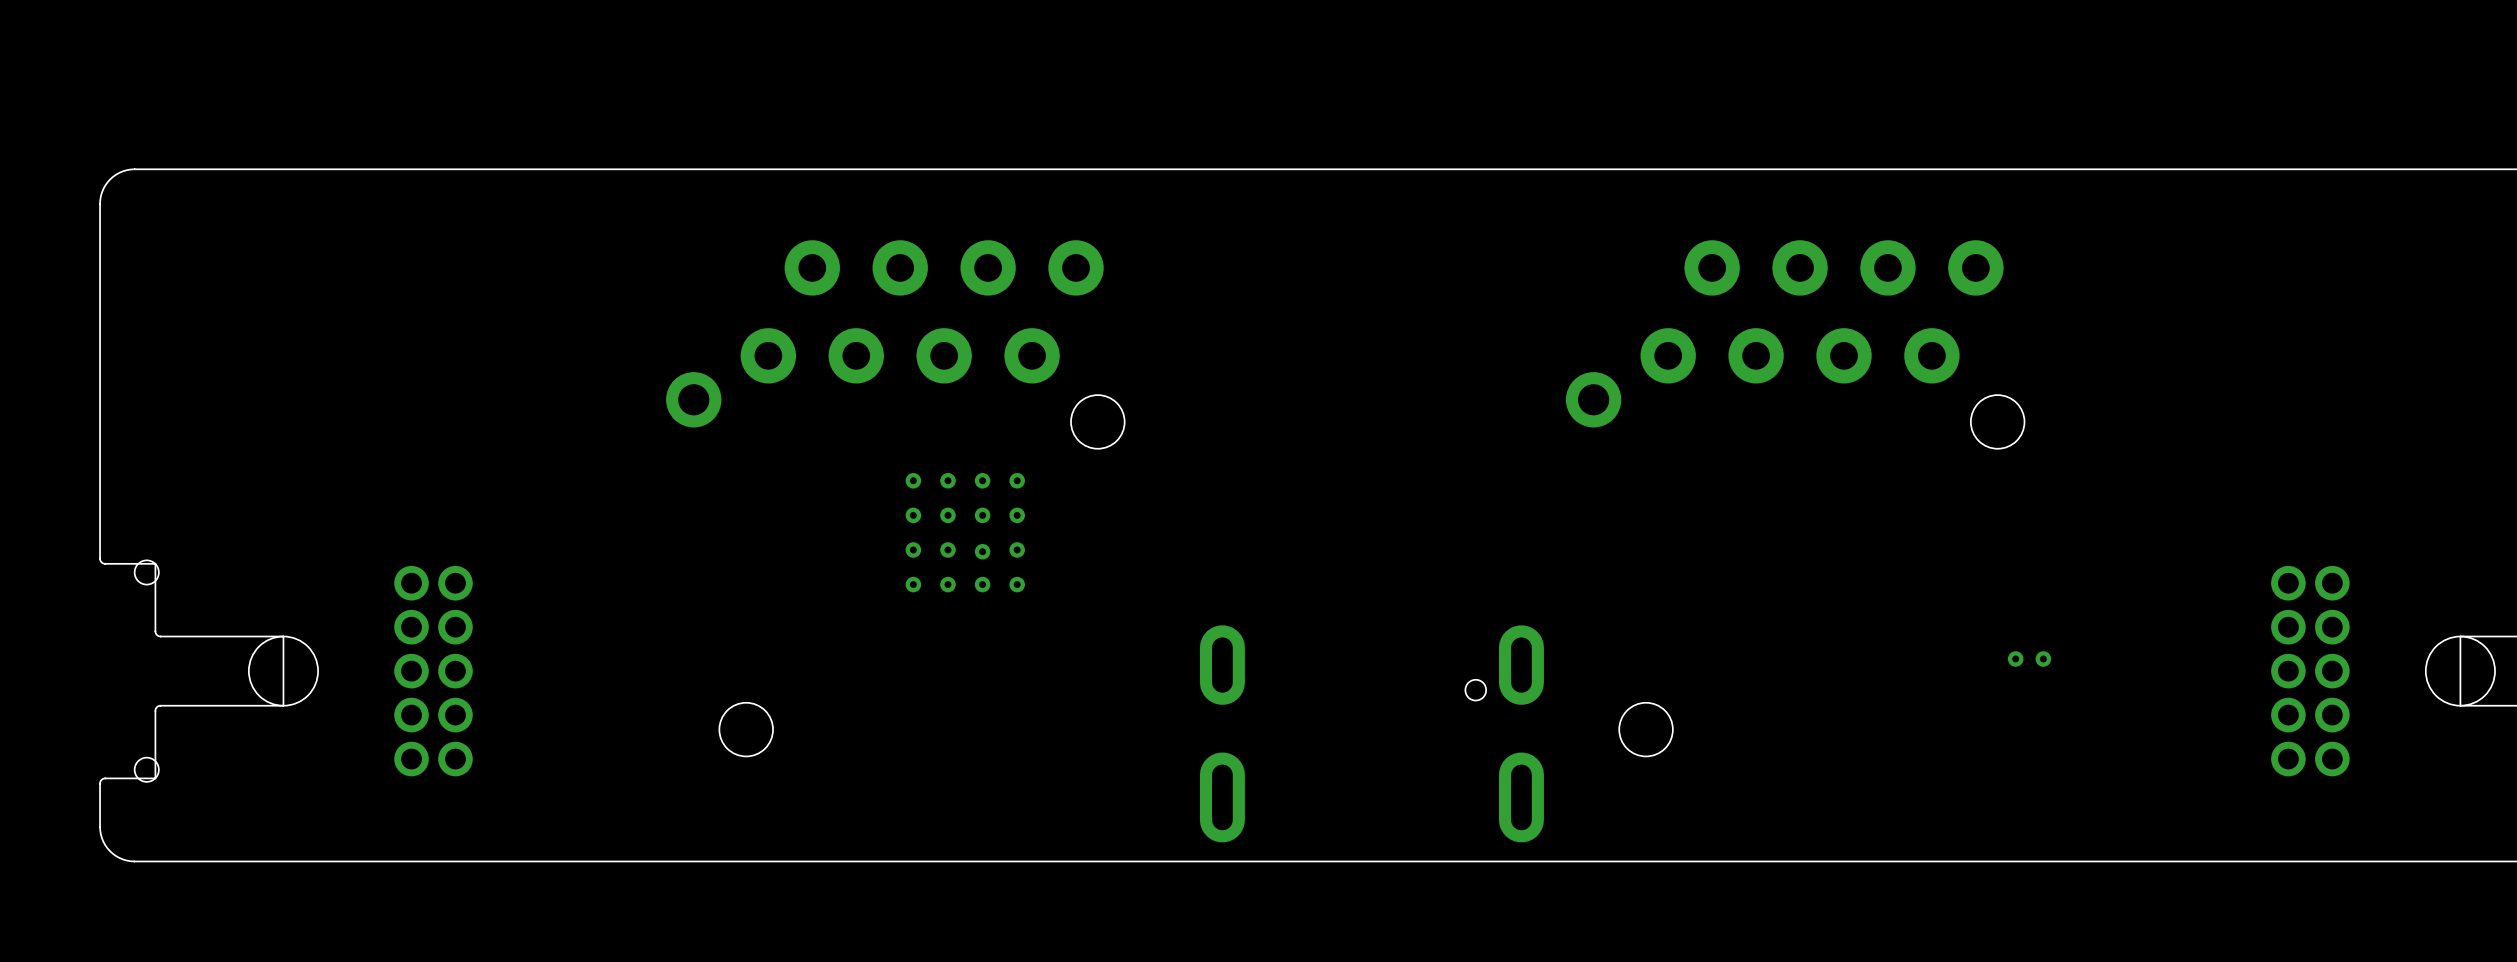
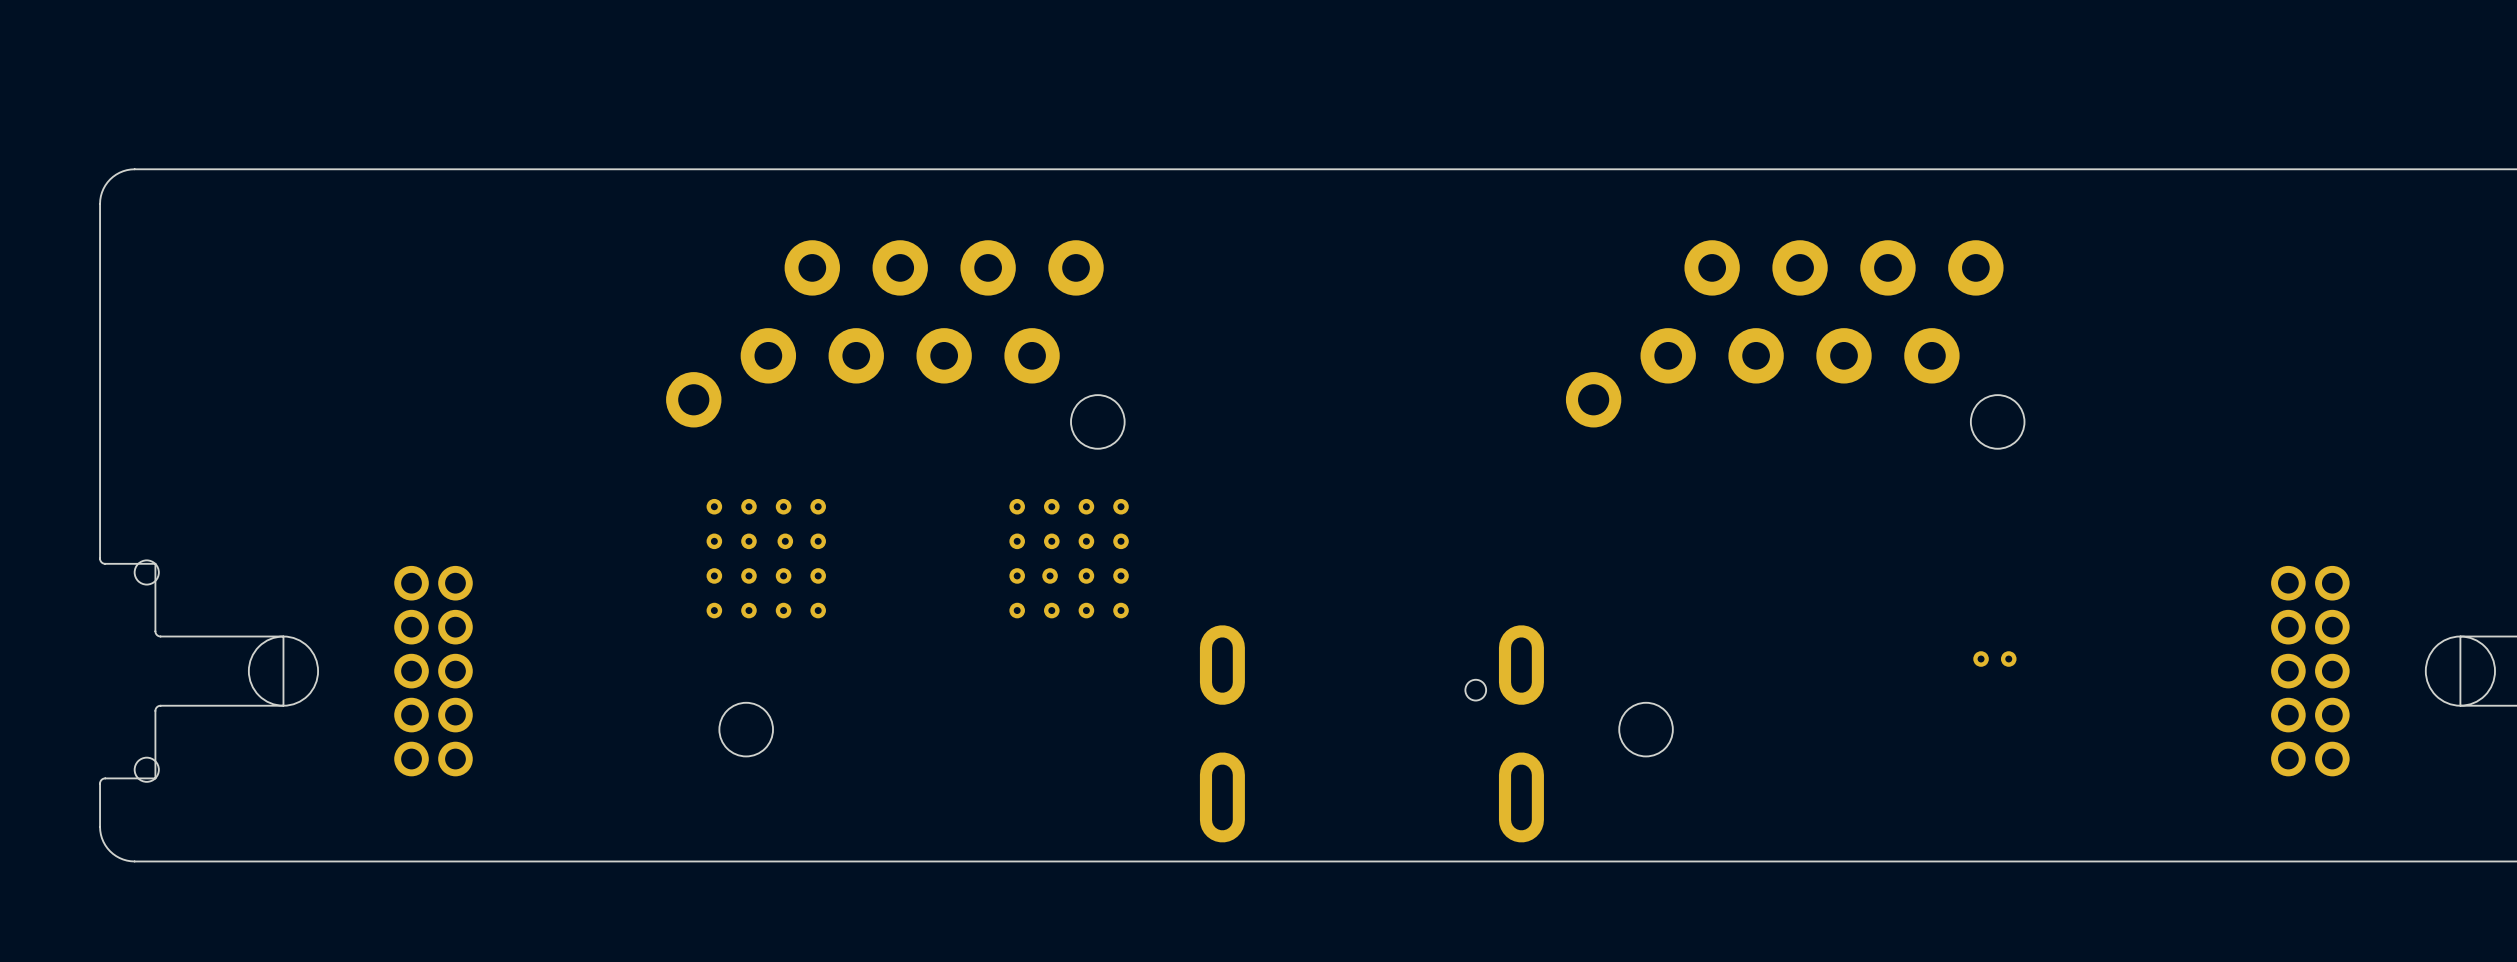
part: (965, 532) -> none
part: none -> (766, 558)
part: none -> (1069, 558)
part position: (2029, 659) -> (1994, 659)

